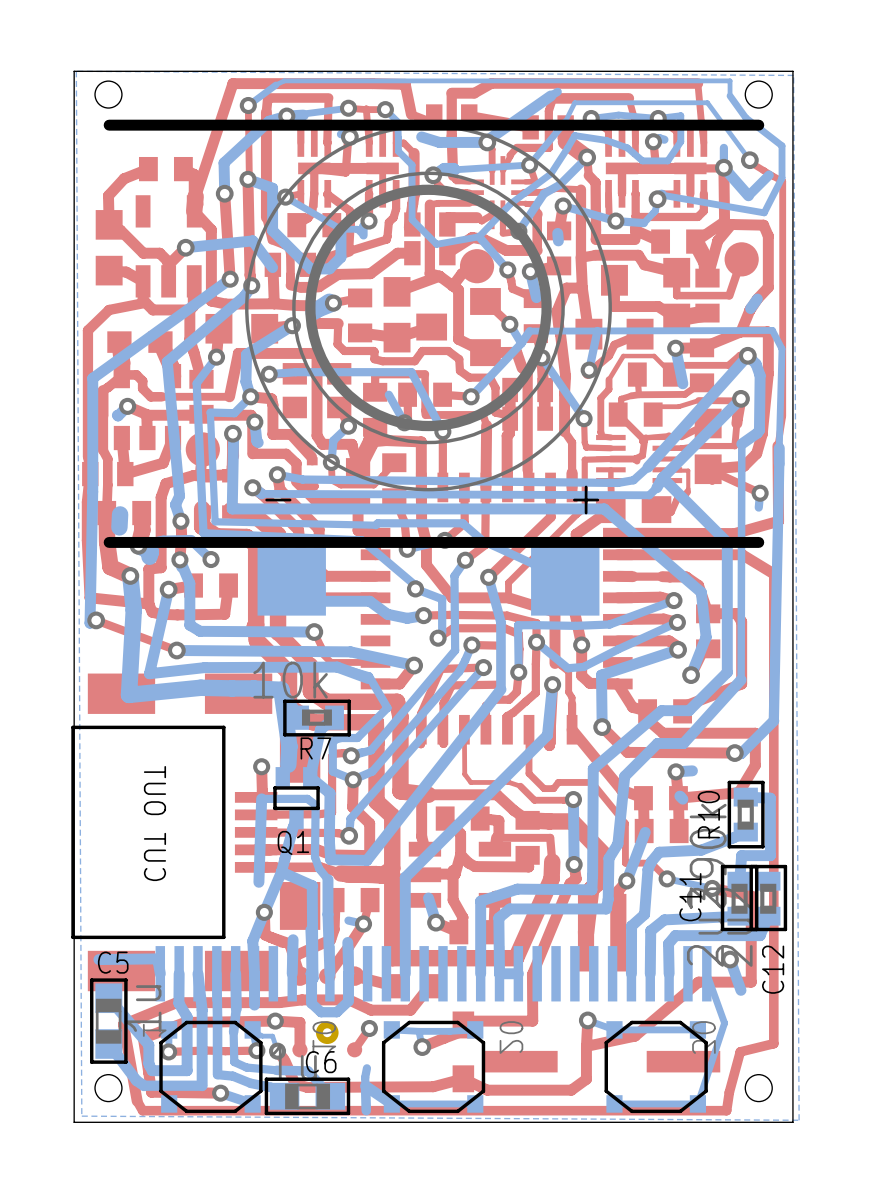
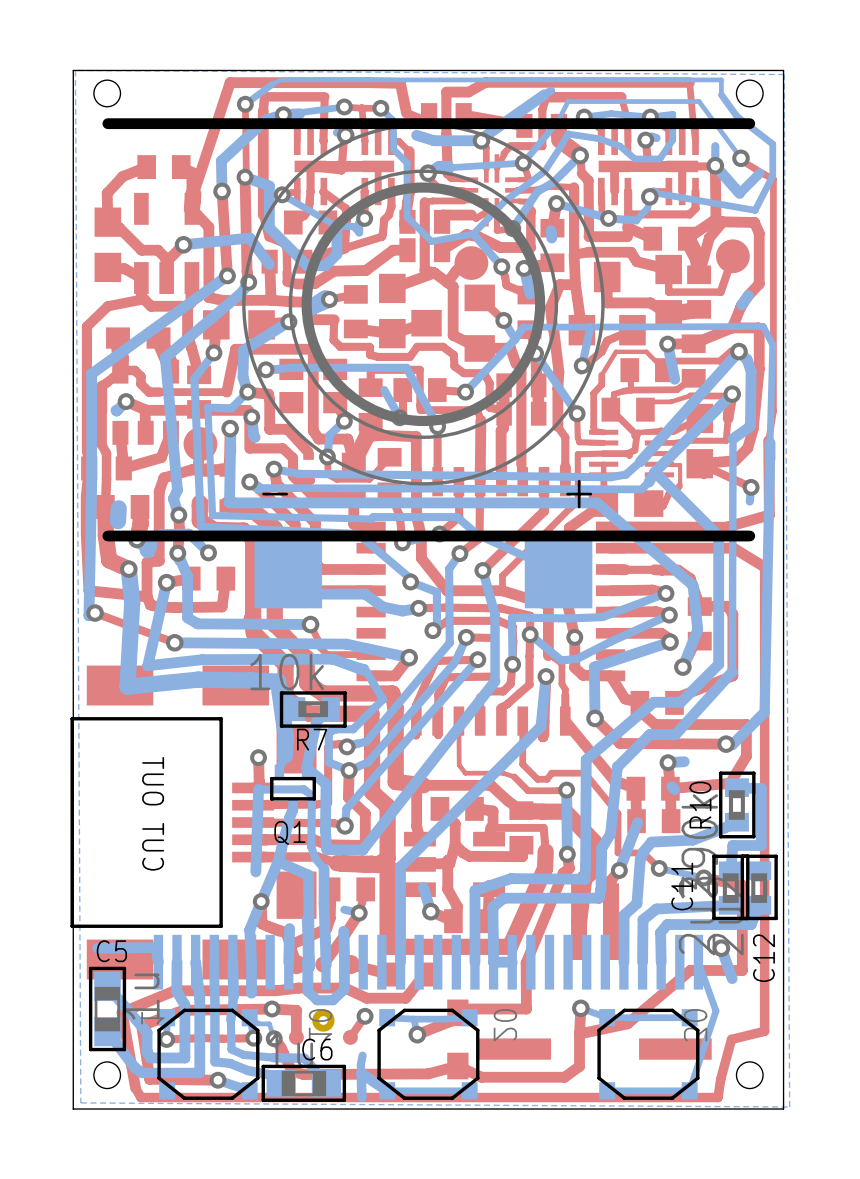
Q1 footprint: [273, 767, 320, 830] -> [270, 764, 316, 813]

